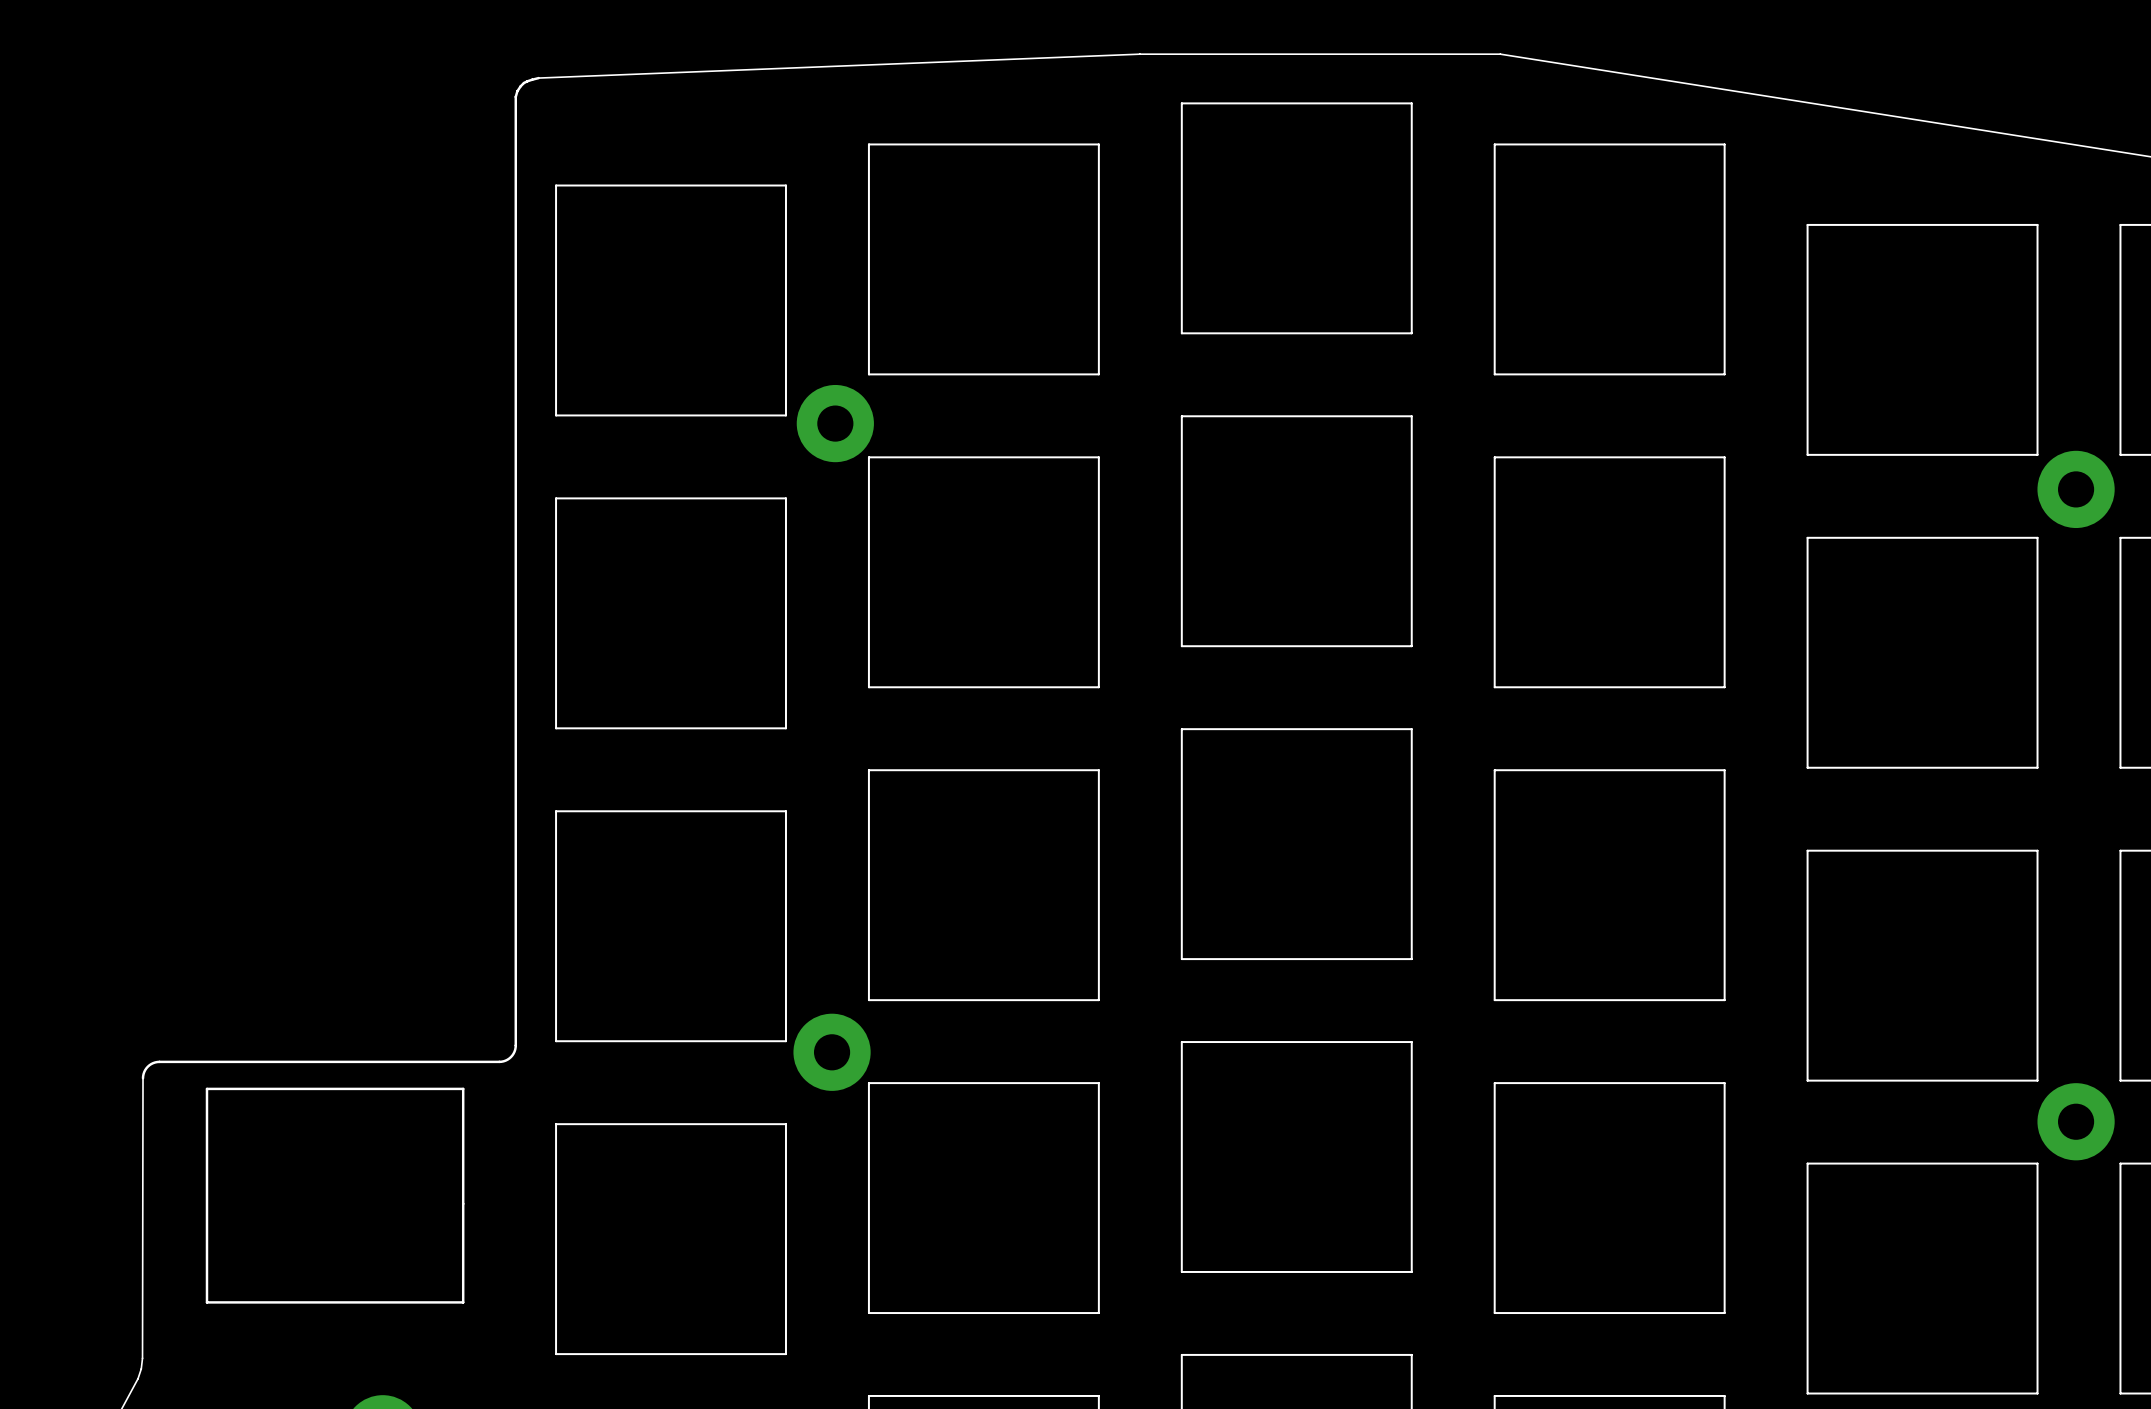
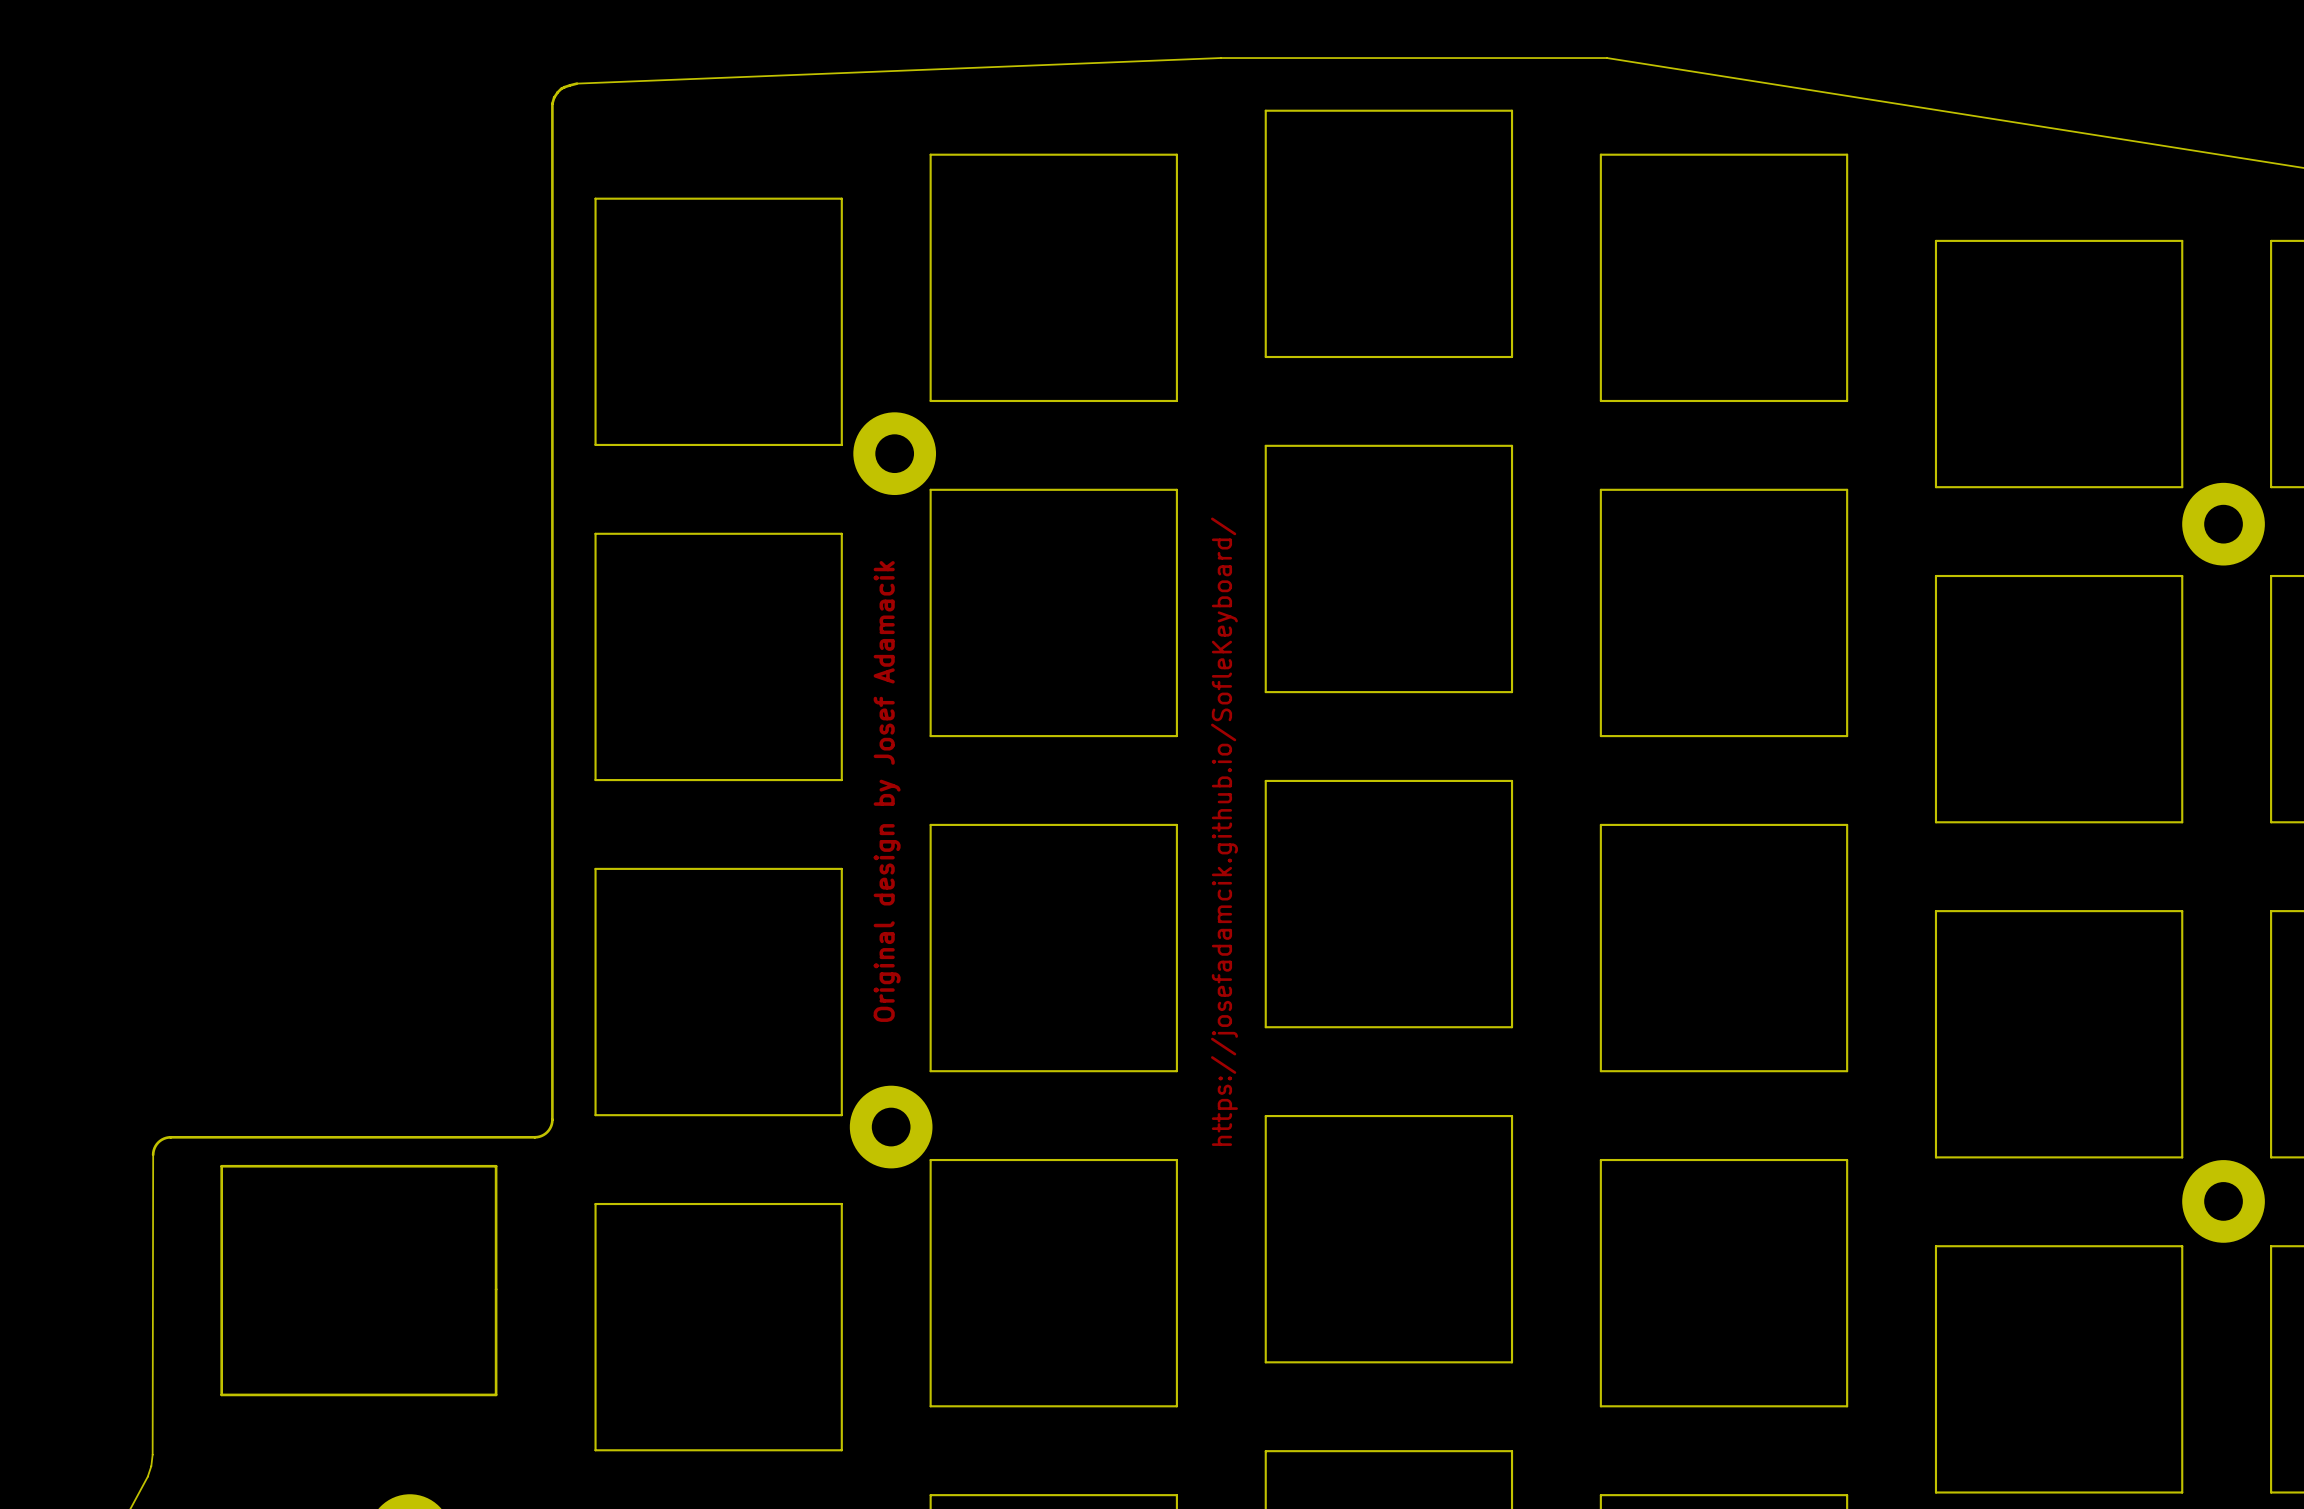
text: none -> Original design by Josef Adamacik (887, 791)
text: none -> https://josefadamcik.github.io/SofleKeyboard/ (1224, 831)

